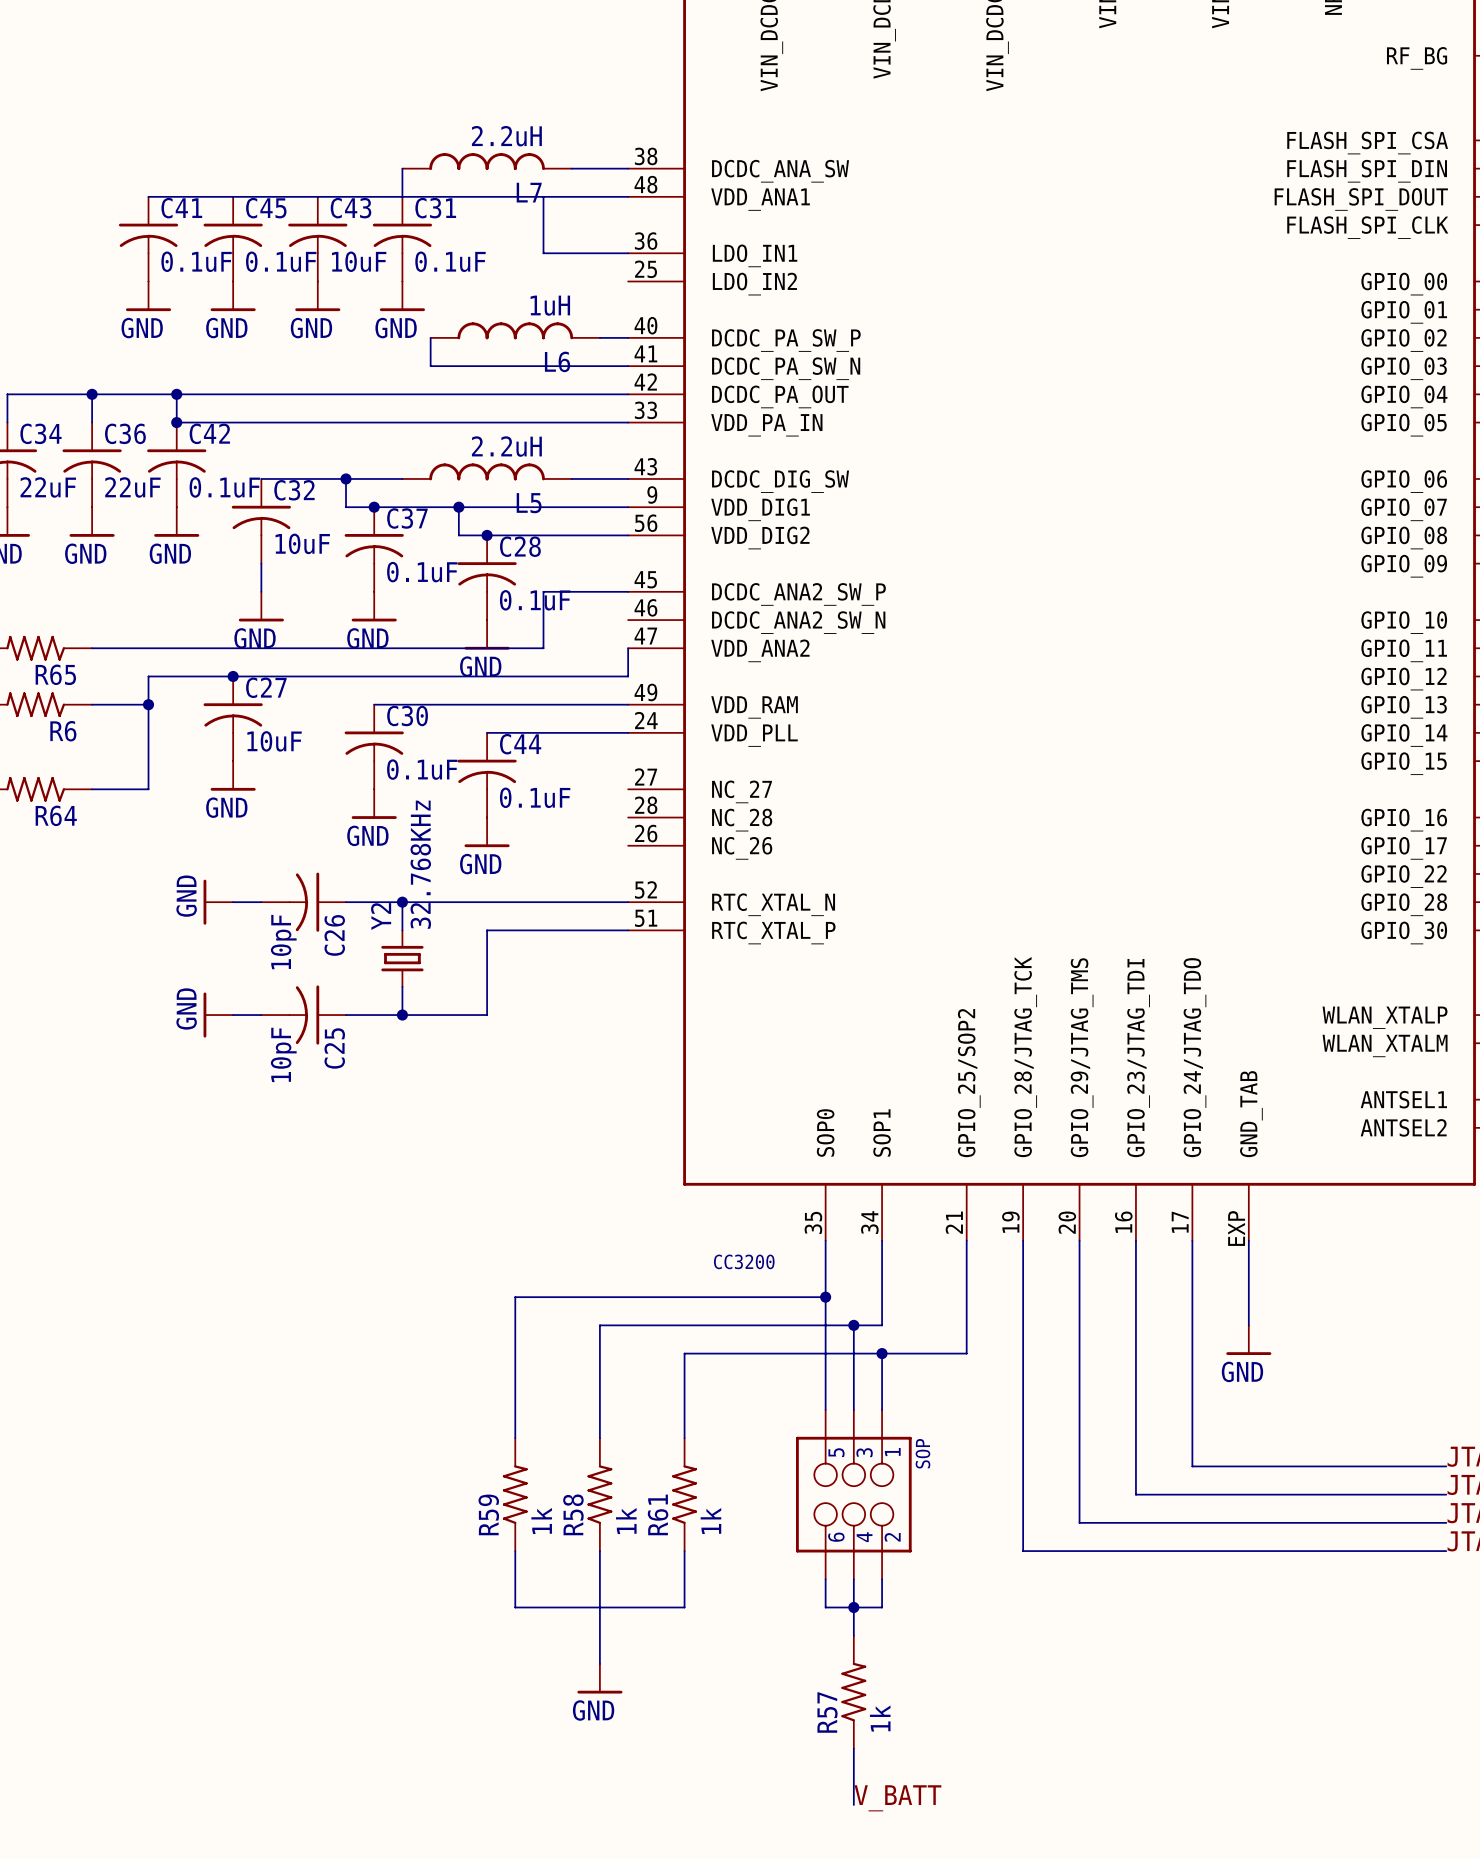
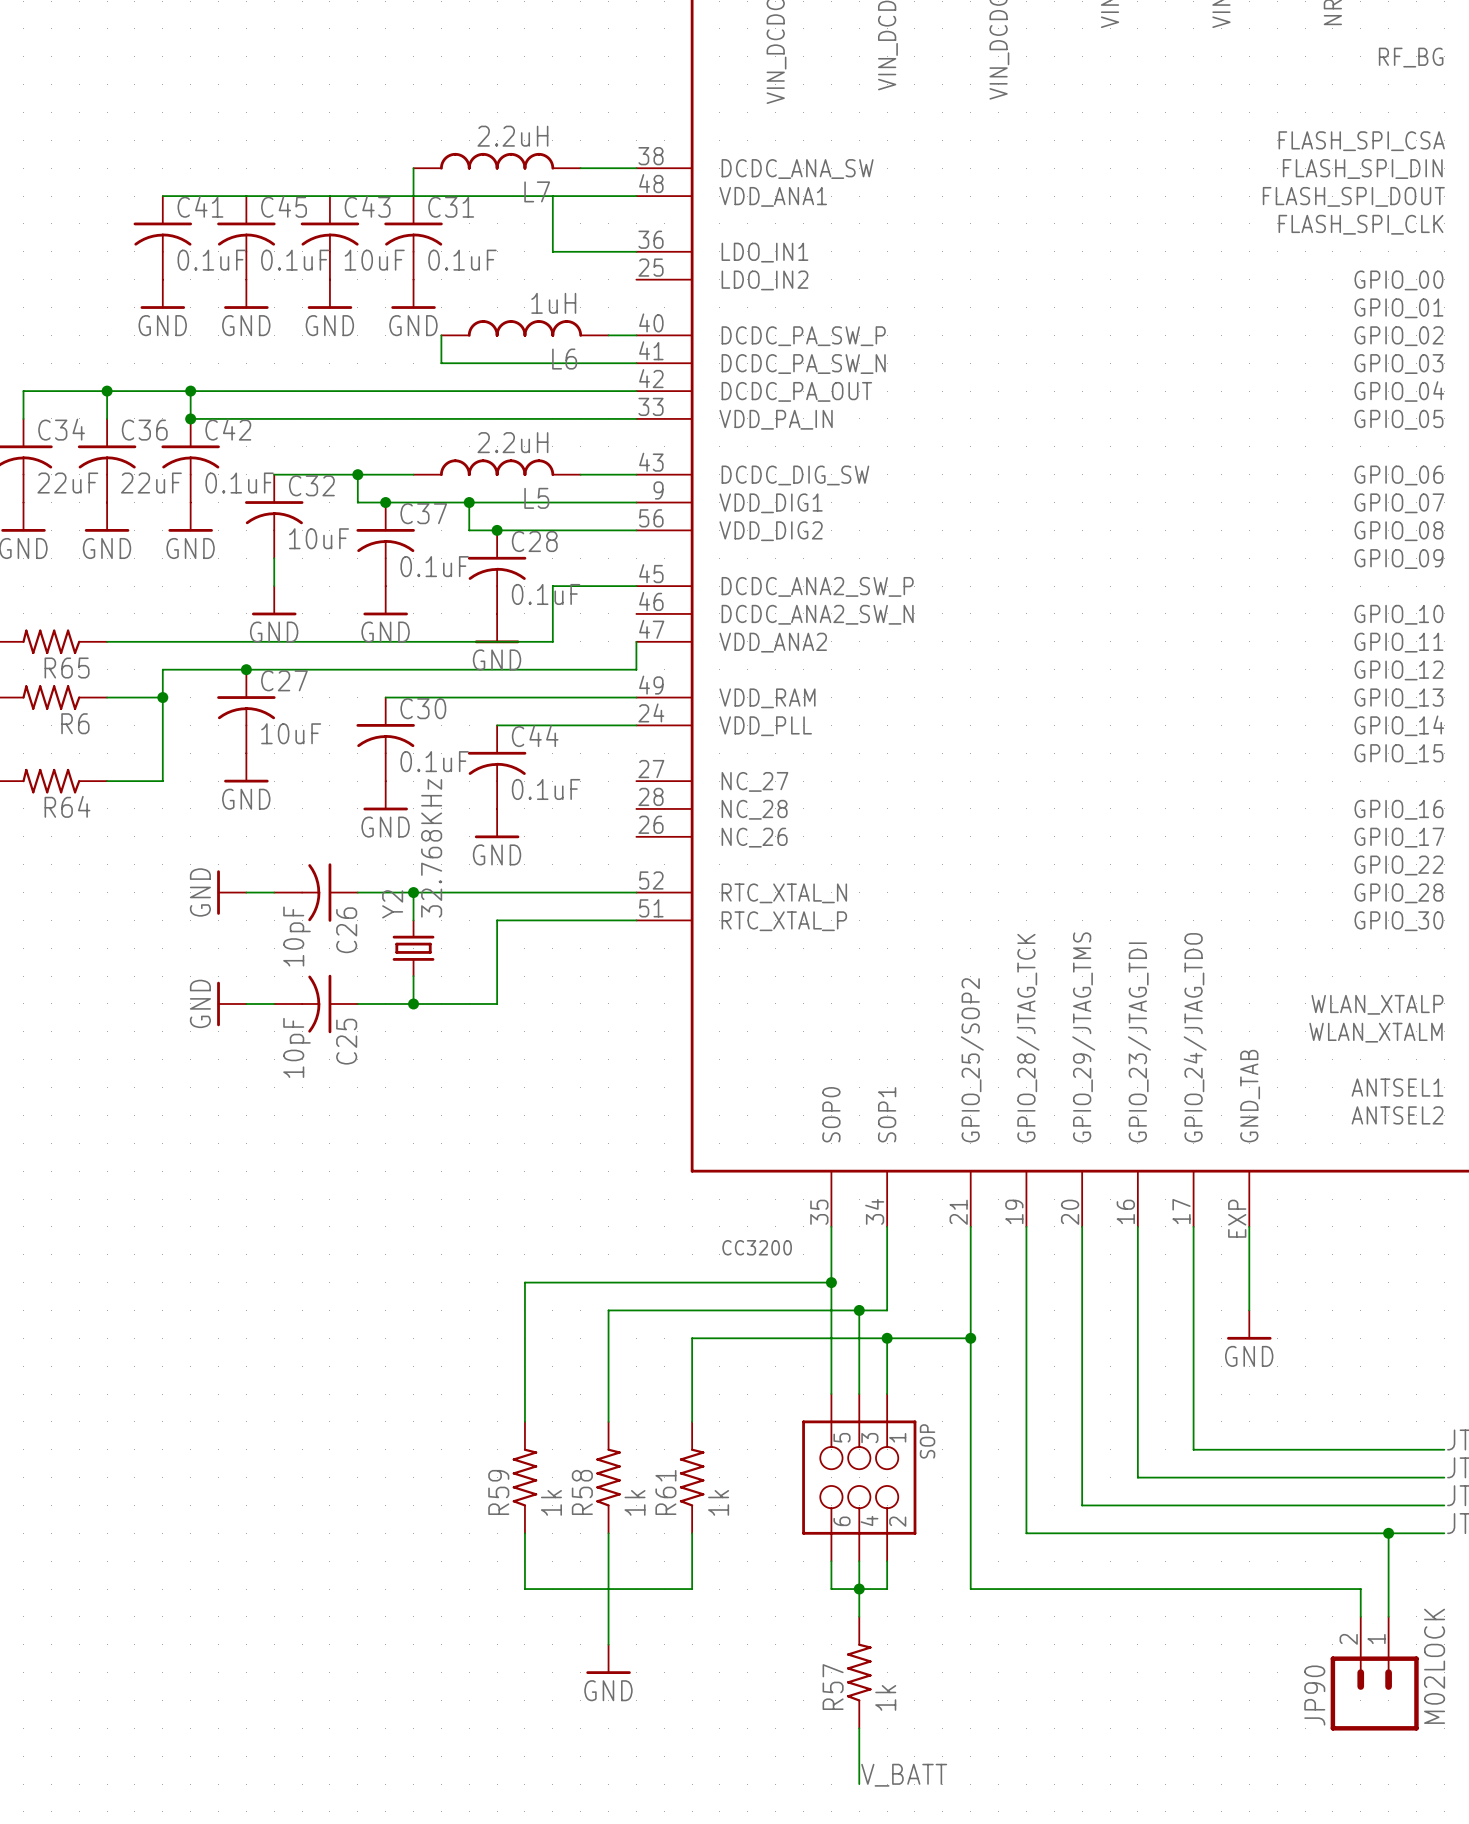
wire: none -> (970, 1338) (970, 1589) (1360, 1589) (1360, 1616)
junction: none -> (970, 1338)
wire: none -> (1388, 1533) (1388, 1616)
junction: none -> (1388, 1533)
JP90: none -> M02LOCK (1374, 1673)

